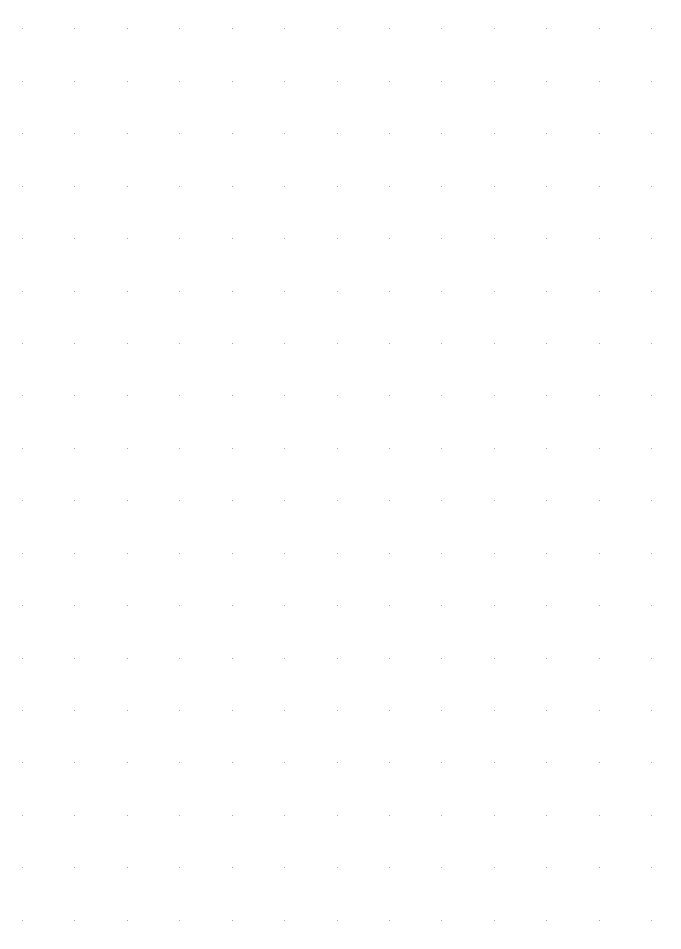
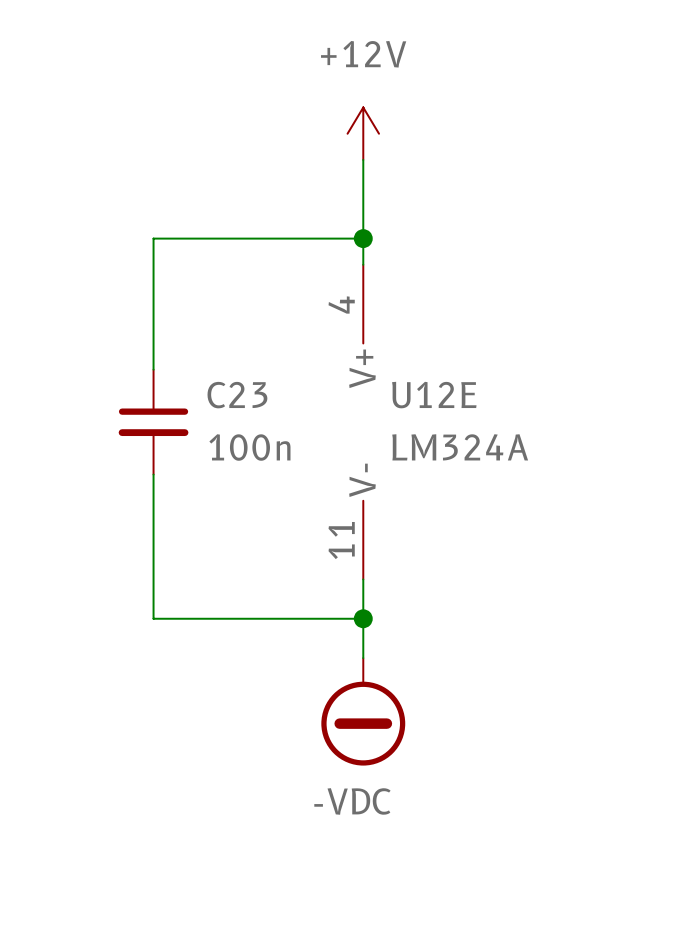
power symbol: none -> +12V (363, 133)
wire: none -> (363, 159) (363, 264)
wire: none -> (363, 238) (153, 238) (153, 369)
junction: none -> (363, 238)
C23: none -> 100n (153, 422)
U12E: none -> LM324A (363, 422)
wire: none -> (153, 474) (153, 618) (363, 618)
wire: none -> (363, 579) (363, 658)
junction: none -> (363, 618)
power symbol: none -> -VDC (363, 711)

